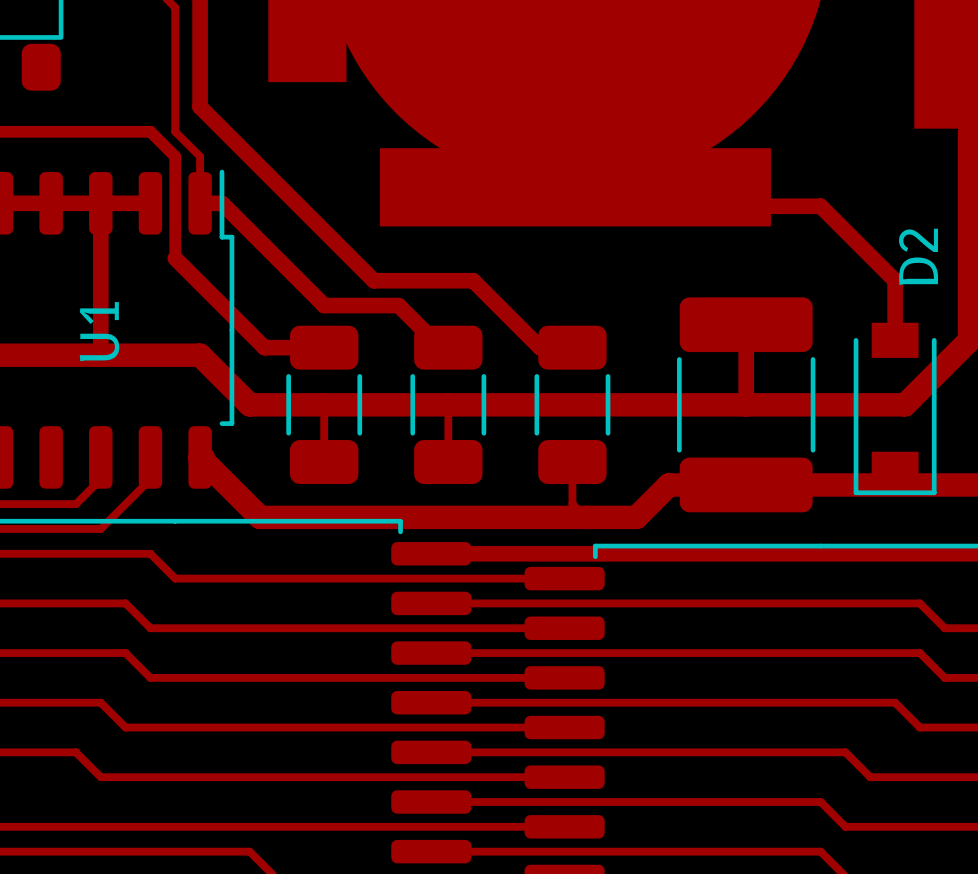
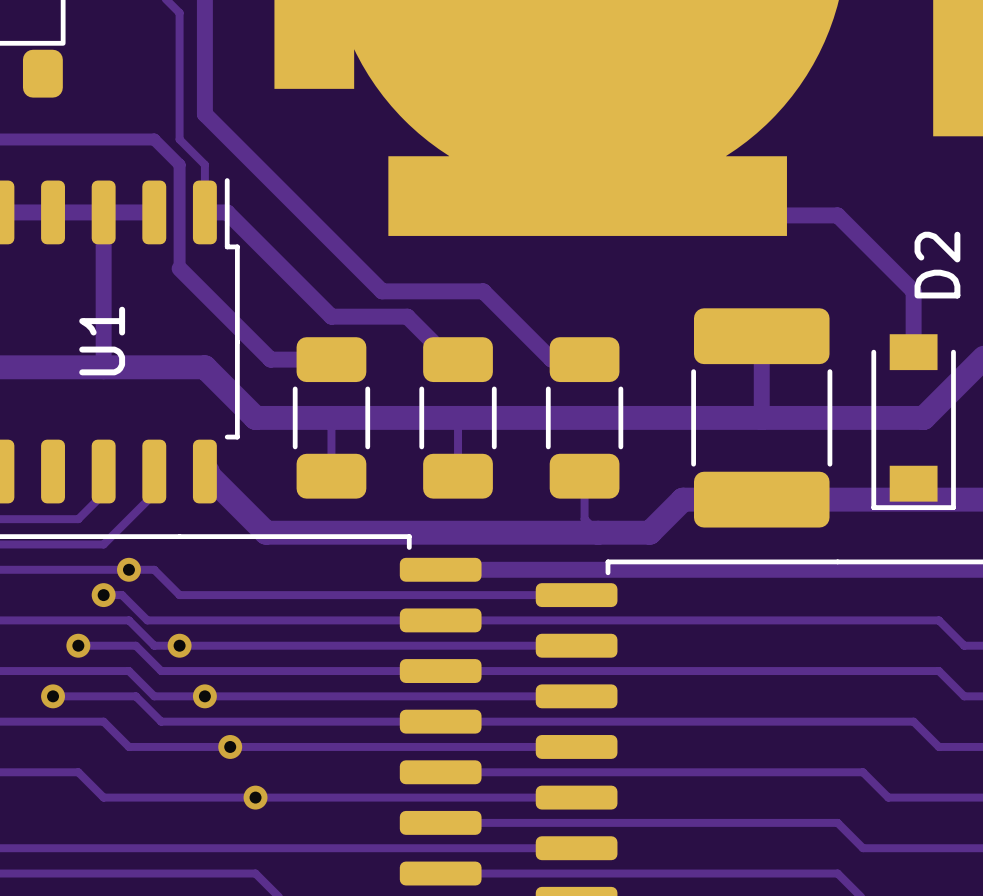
via: none -> (128, 569)
track: none -> (103, 595) (122, 595) (147, 620) (440, 620)
via: none -> (103, 595)
track: none -> (78, 645) (135, 645) (161, 671) (440, 671)
via: none -> (78, 645)
via: none -> (179, 645)
track: none -> (53, 696) (135, 696) (161, 721) (440, 721)
via: none -> (53, 696)
via: none -> (204, 696)
via: none -> (230, 746)
via: none -> (255, 797)

